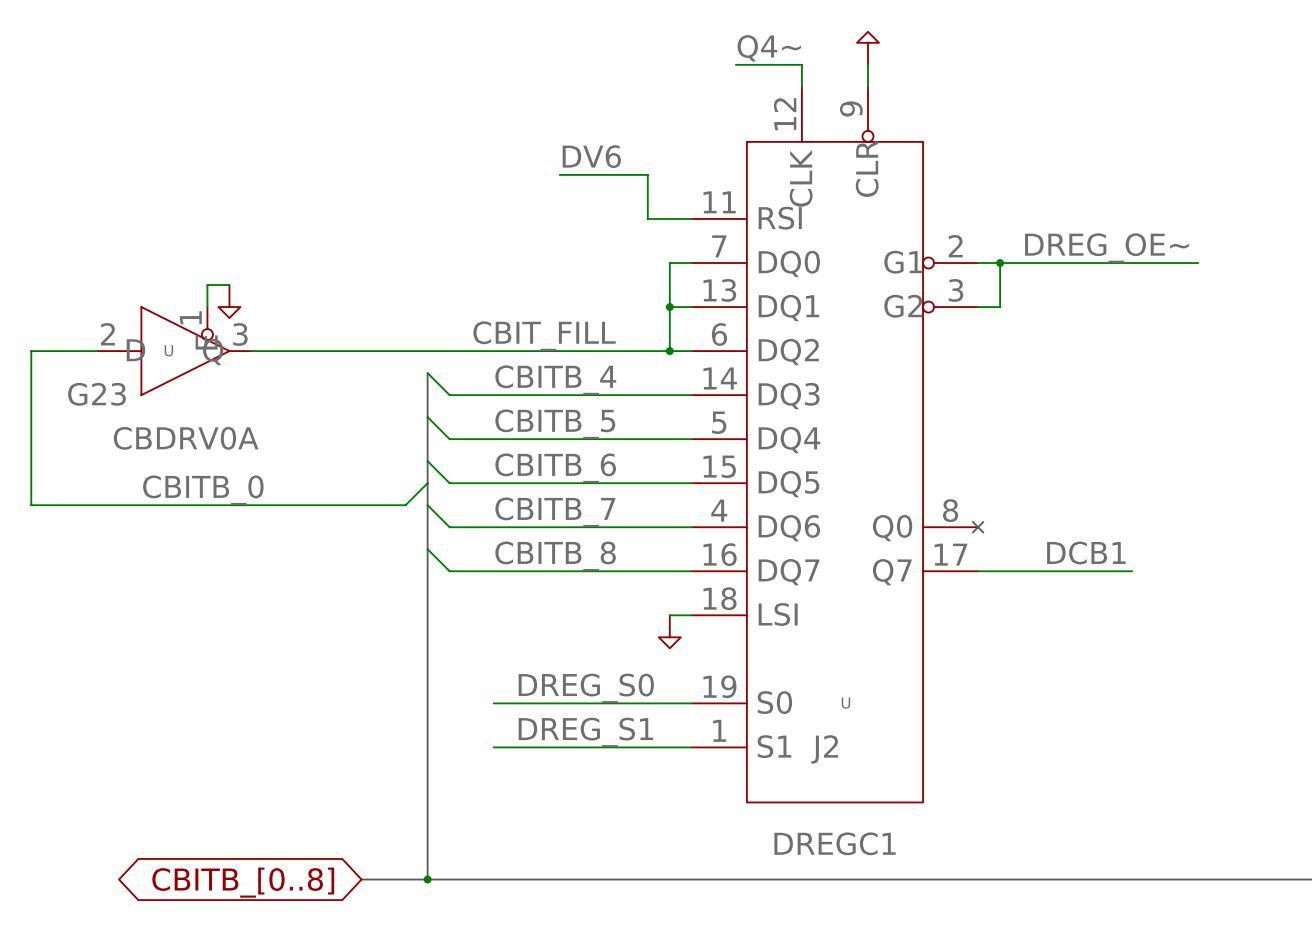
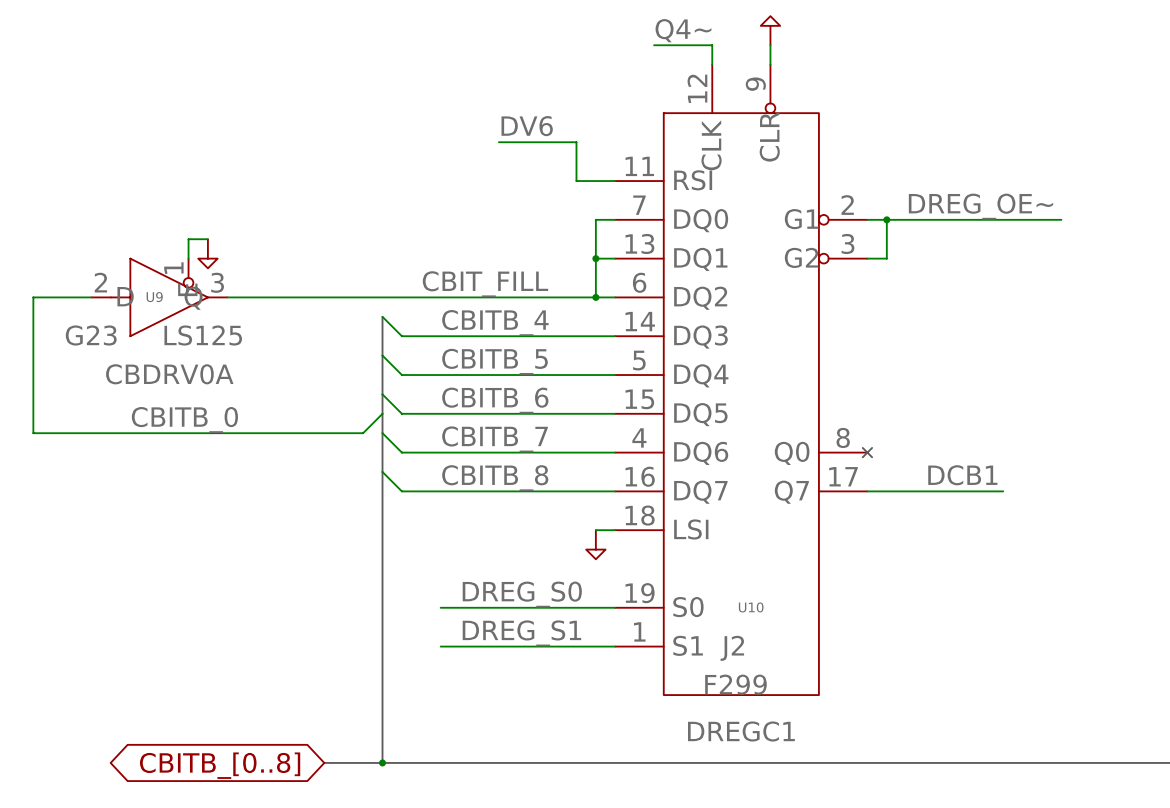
U name: U (168, 350) -> U9 (154, 297)
U value: none -> LS125 (203, 335)
U name: U (845, 703) -> U10 (751, 607)
U value: none -> F299 (735, 684)

